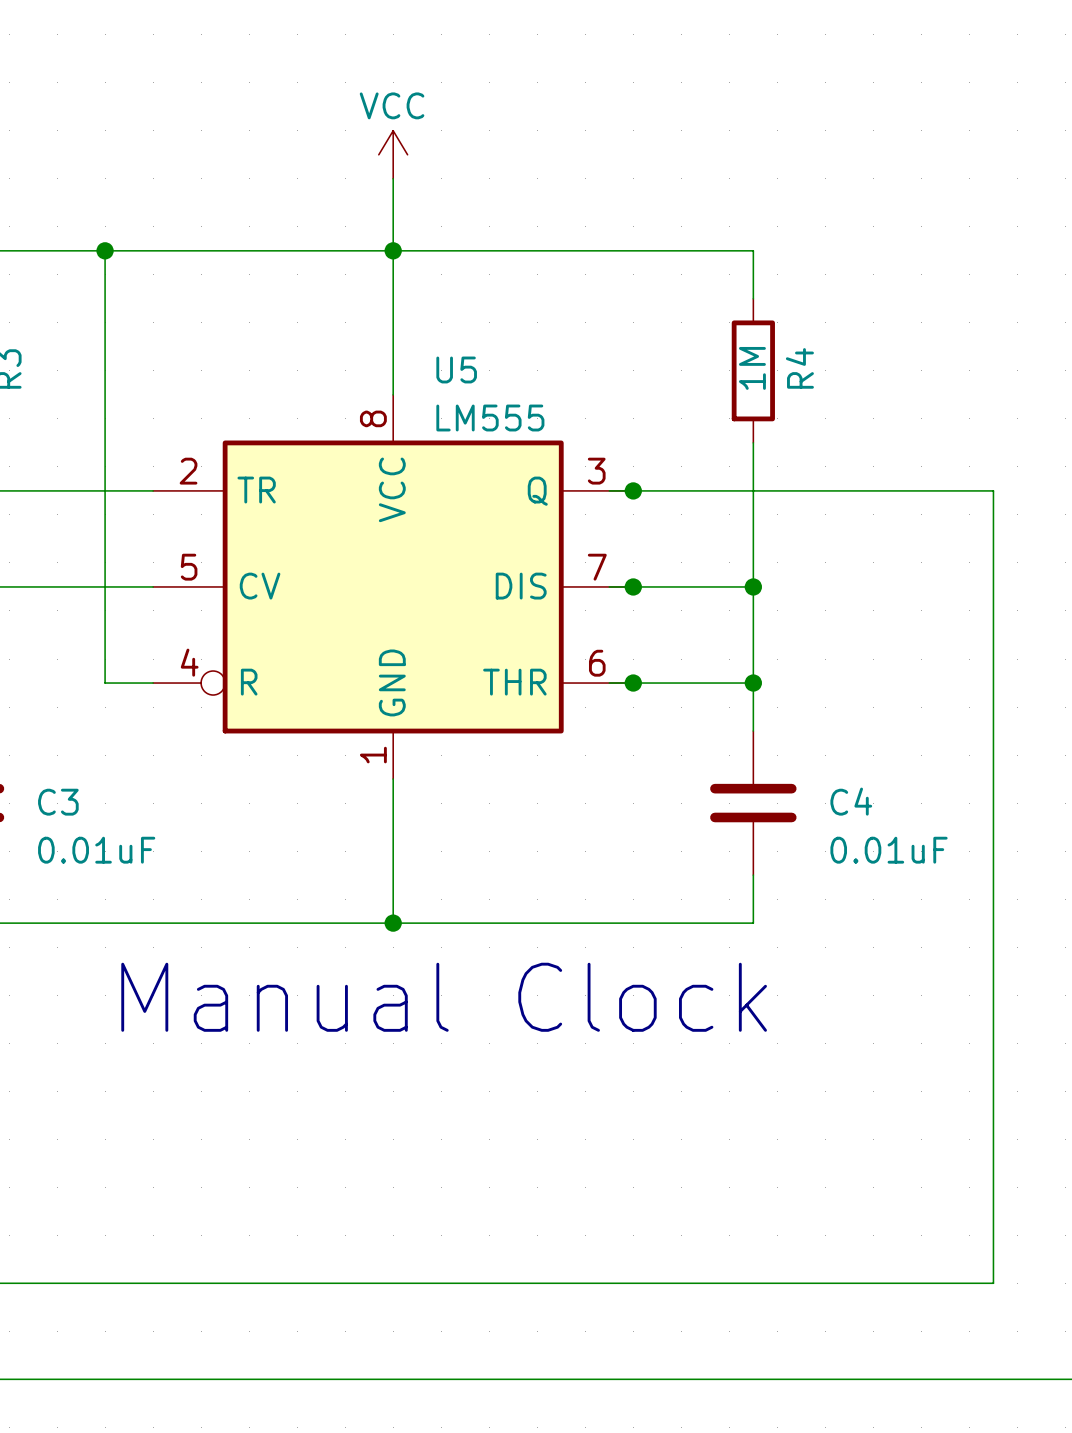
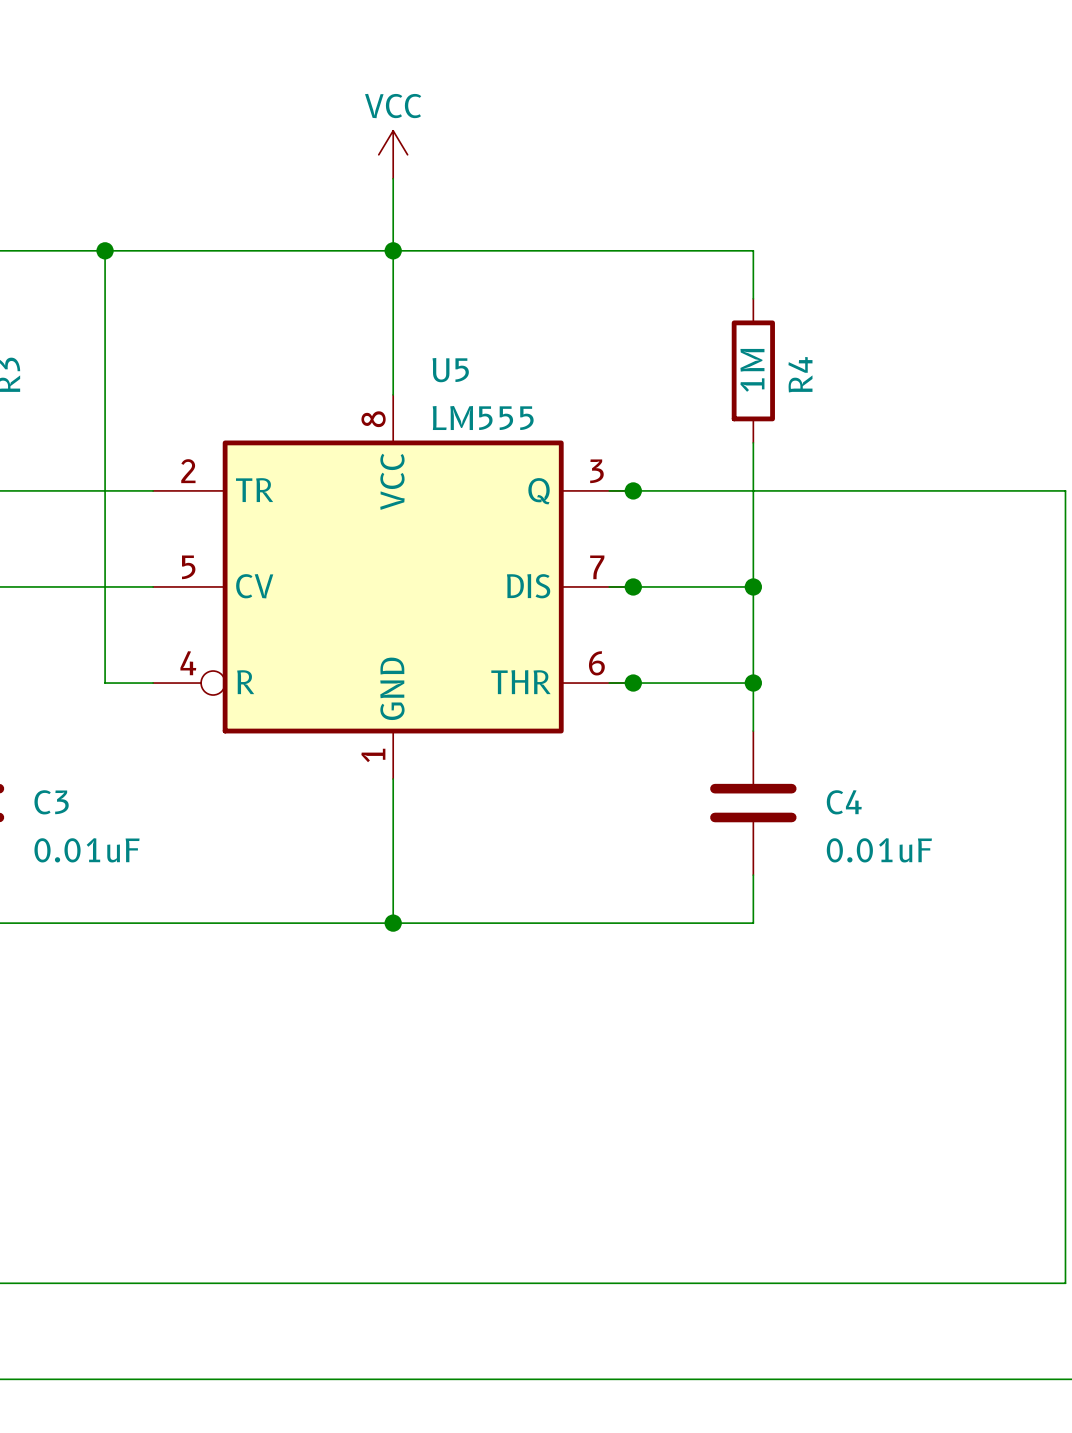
wire: (993, 490) (993, 1283) -> (993, 490) (1065, 490) (1065, 1283) (993, 1283)
text: Manual Clock (444, 997) -> none

